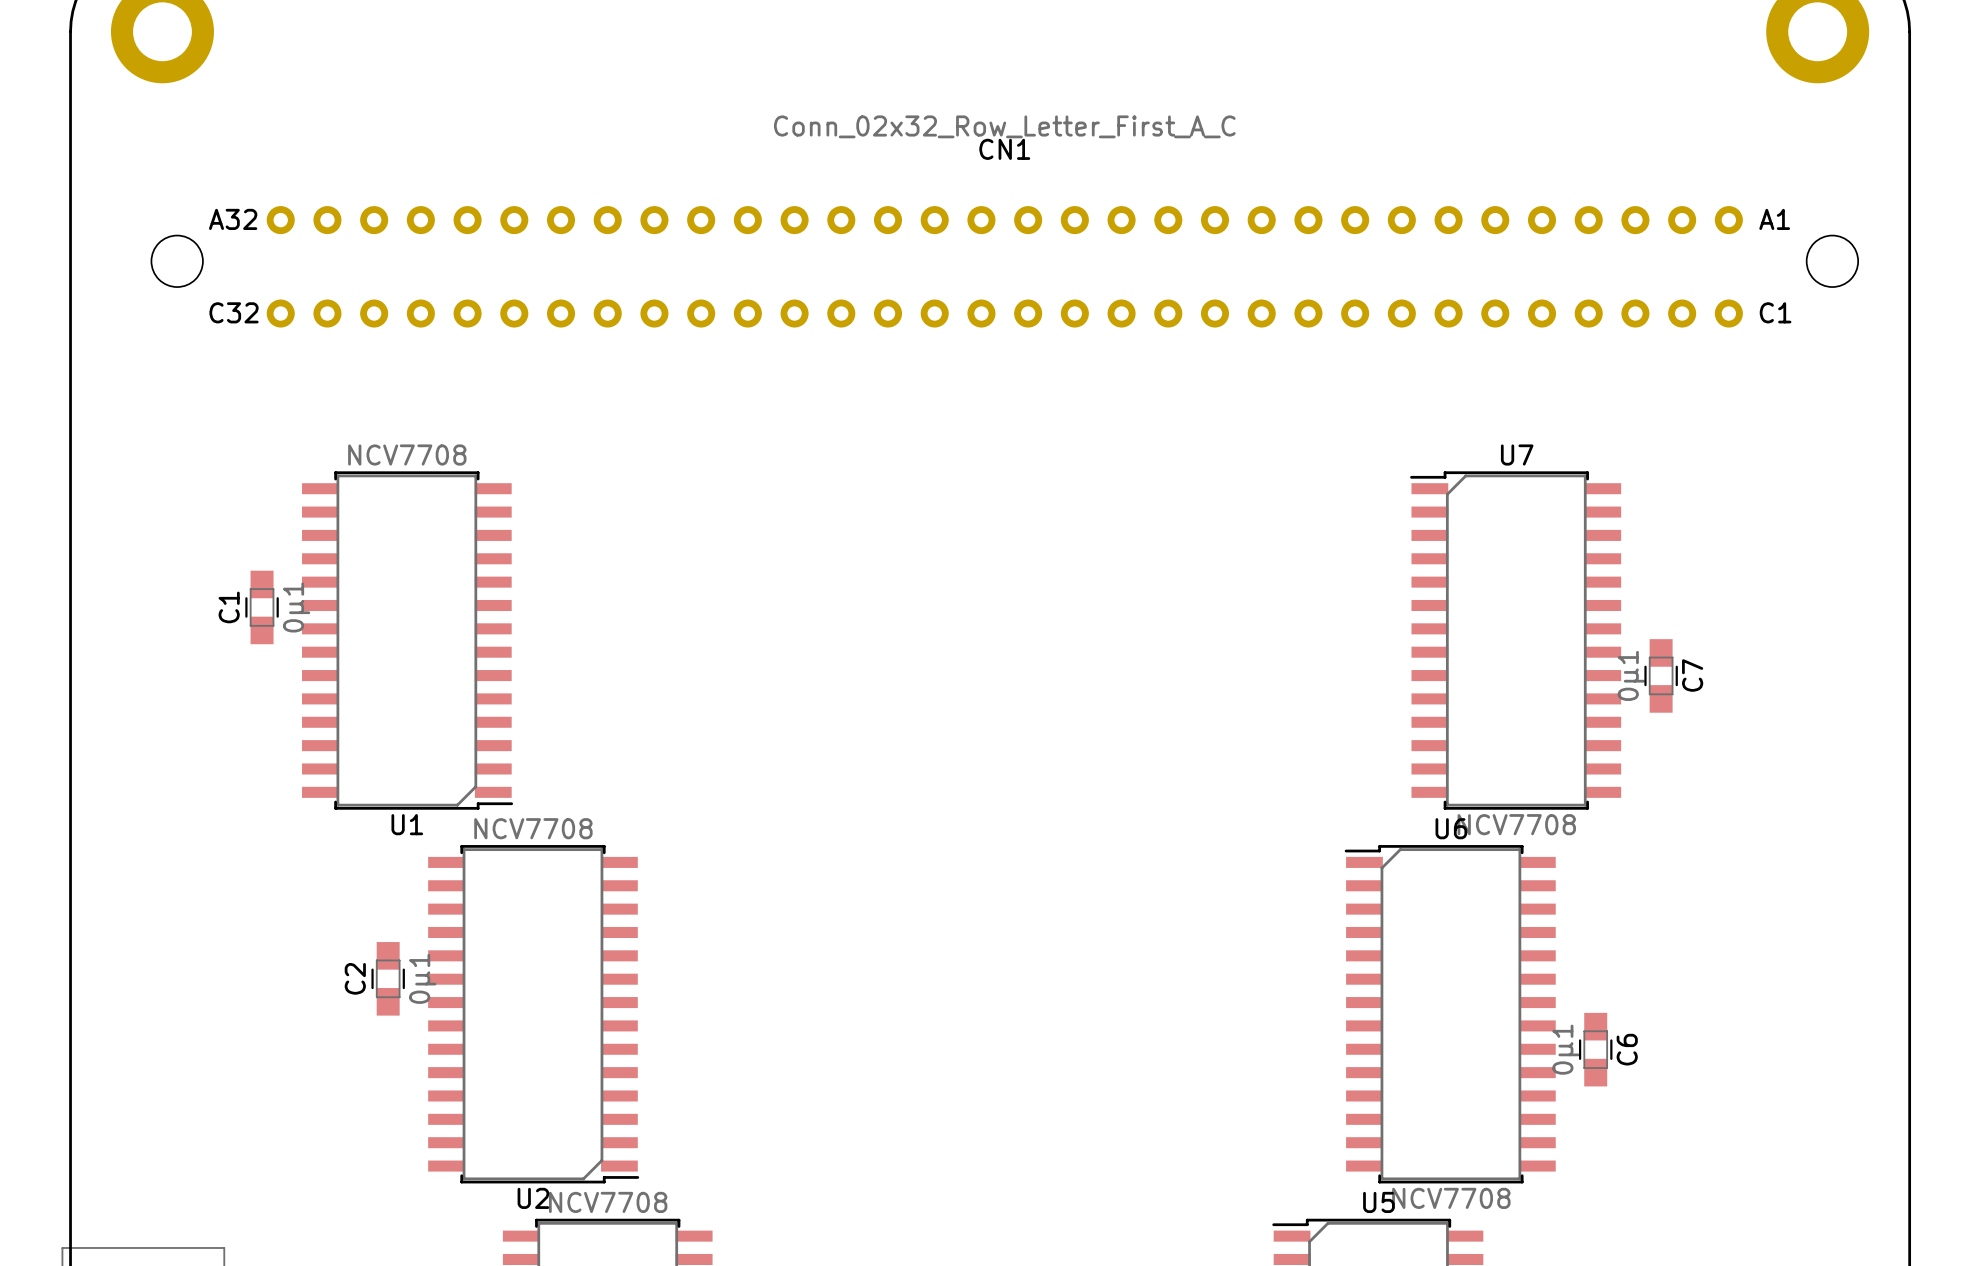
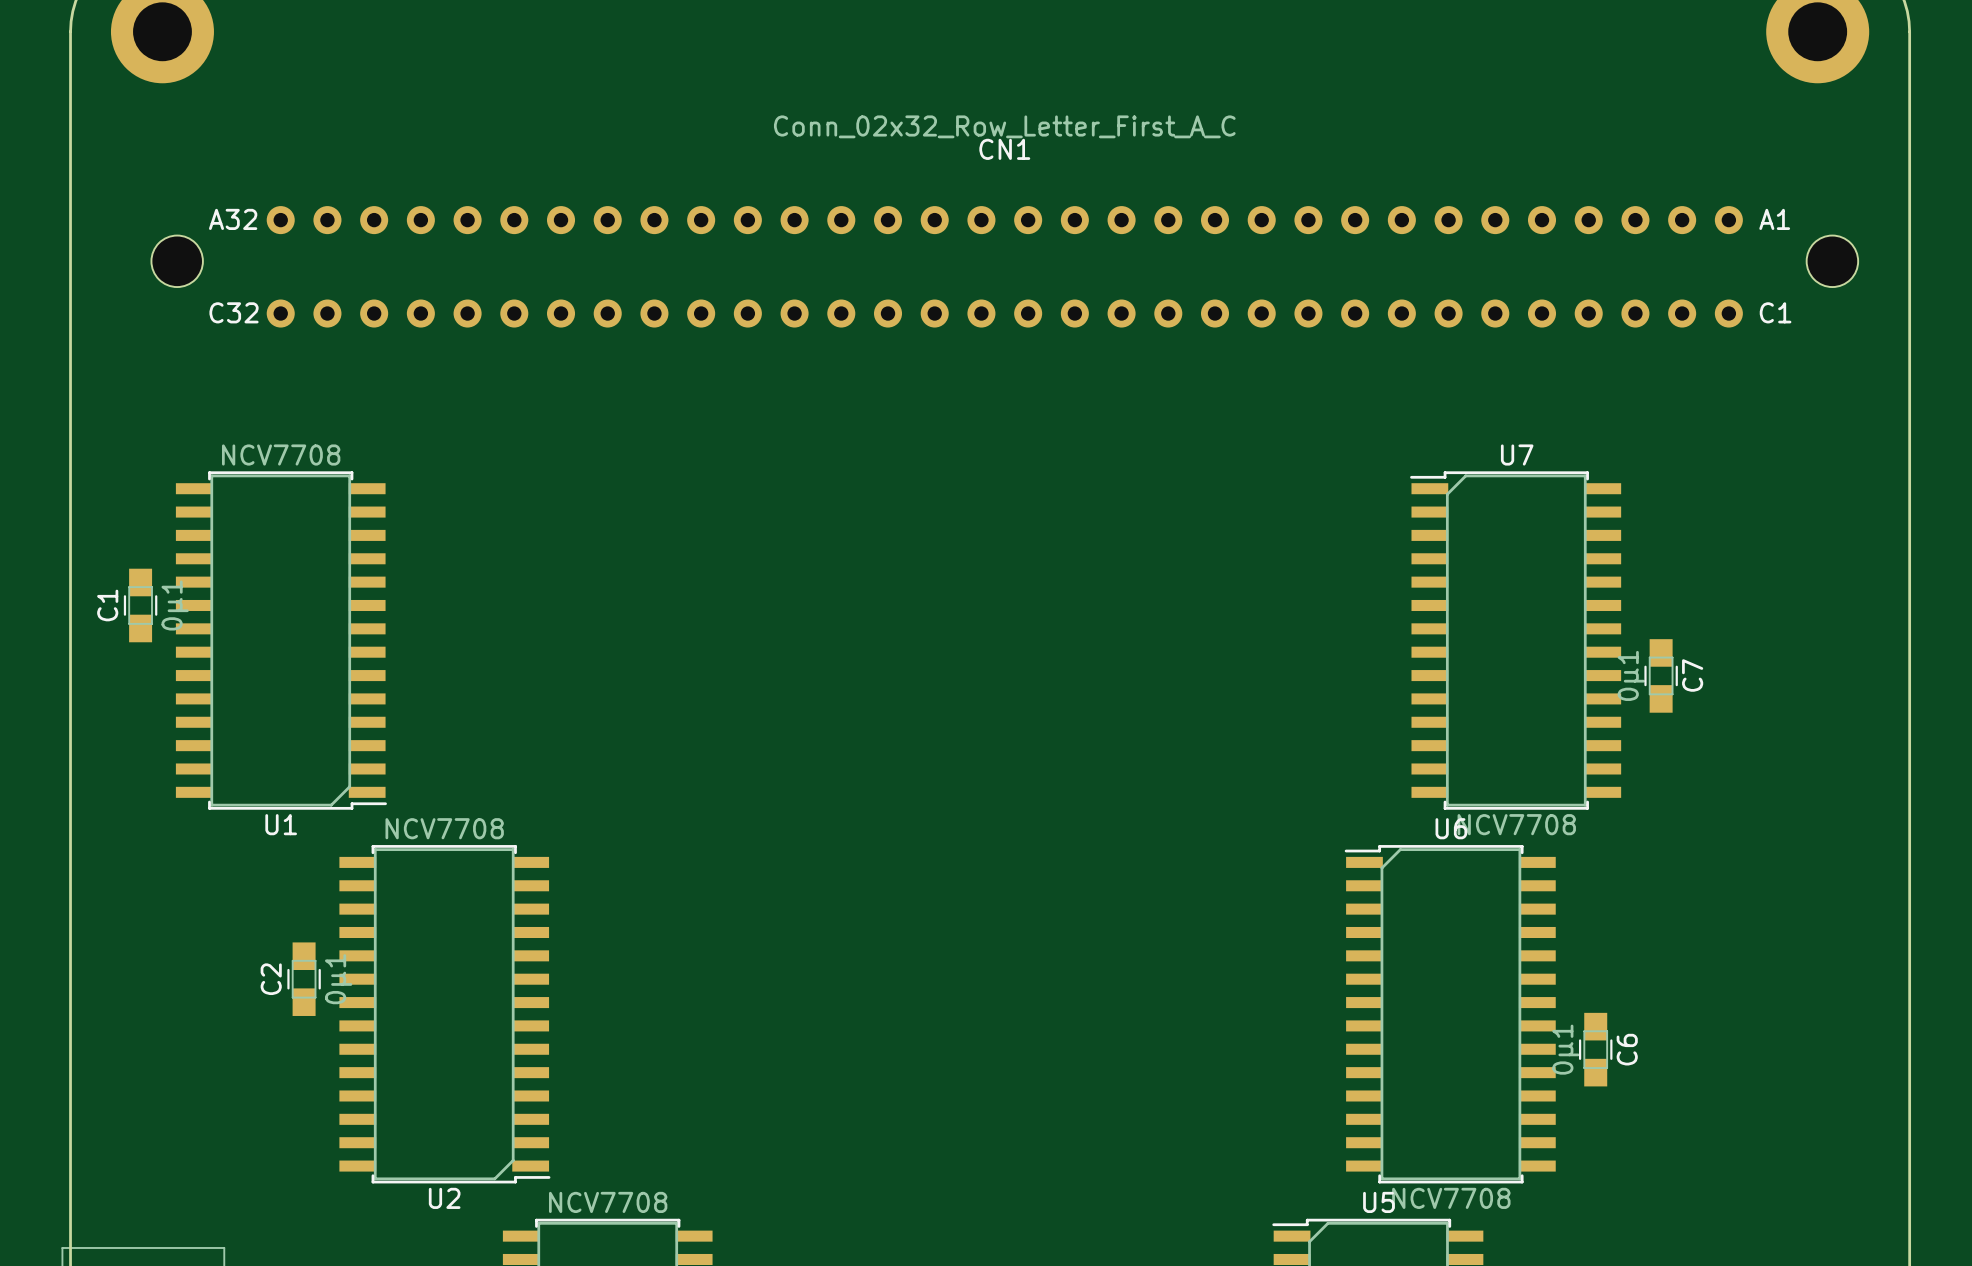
C1 position: (262, 607) -> (140, 605)
U1 position: (407, 640) -> (281, 640)
C2 position: (388, 978) -> (304, 979)
U2 position: (533, 1014) -> (444, 1014)

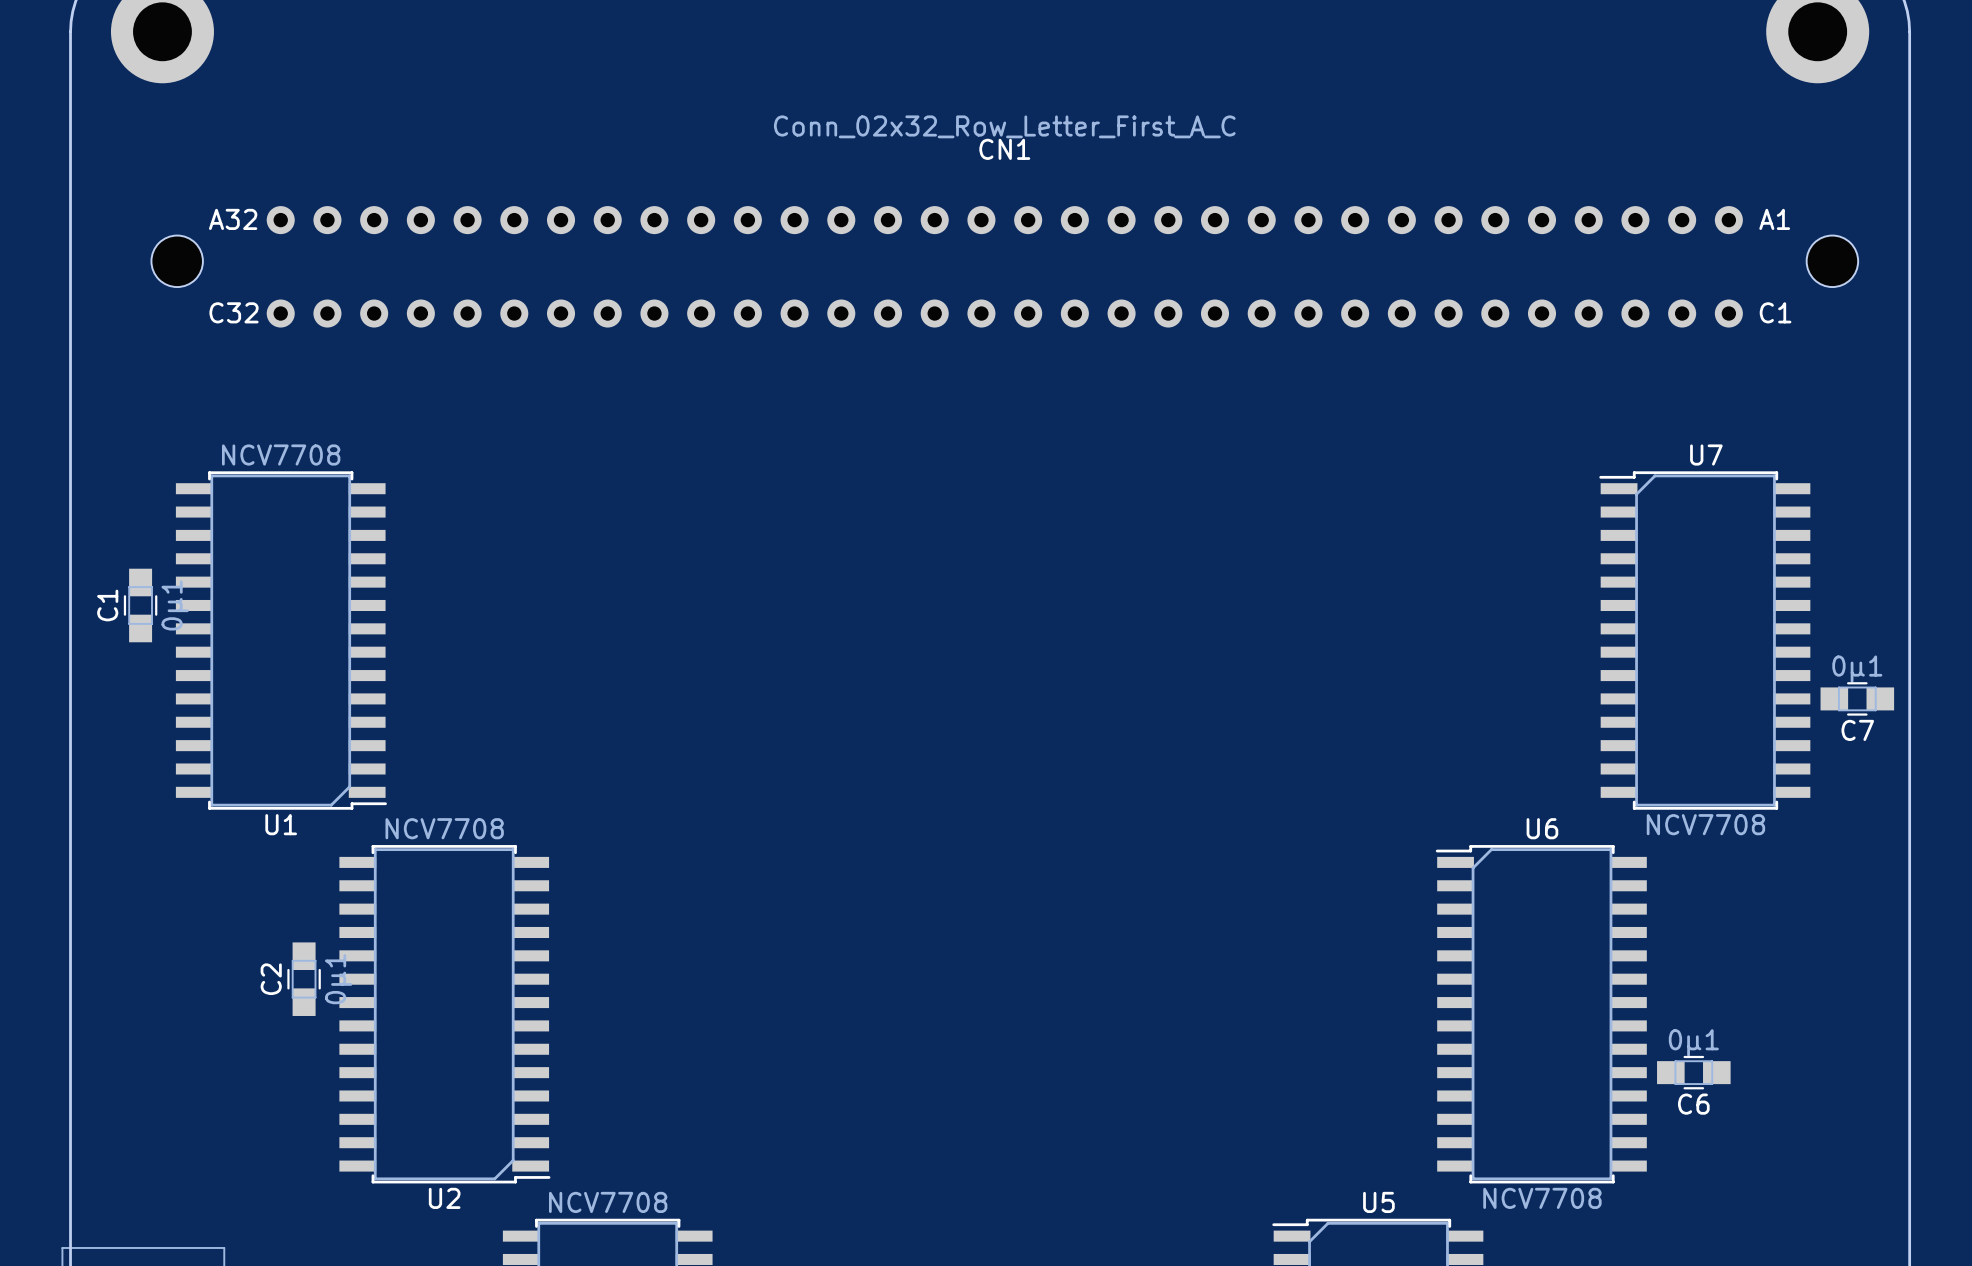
U7 position: (1515, 640) -> (1704, 640)
C7 rotation: 0° (1661, 675) -> 90° clockwise (1857, 698)
C7 position: (1661, 675) -> (1857, 698)
U6 position: (1450, 1014) -> (1541, 1014)
C6 rotation: 0° (1595, 1049) -> 90° clockwise (1693, 1072)
C6 position: (1595, 1049) -> (1693, 1072)

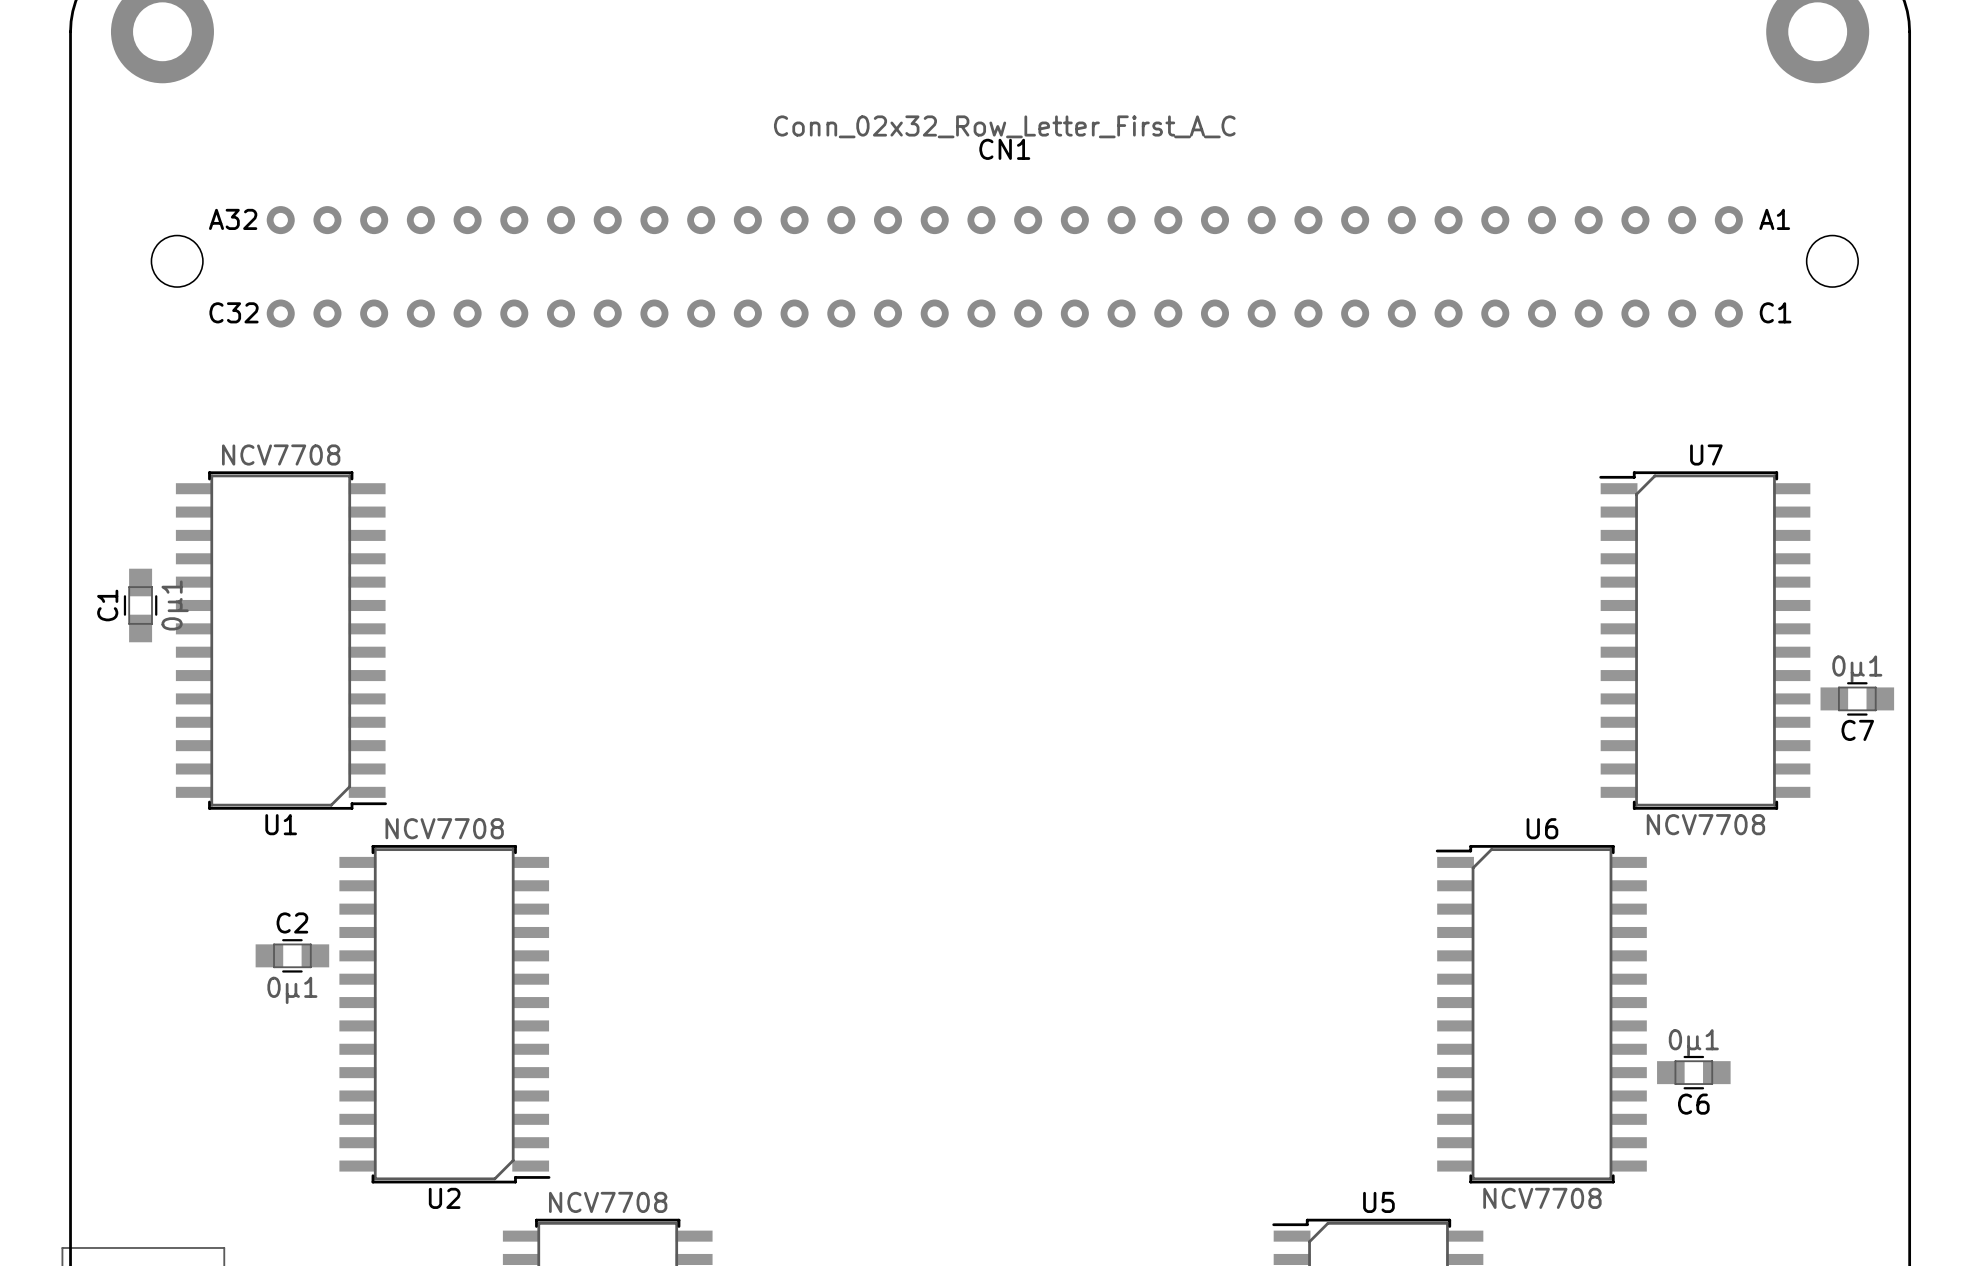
C2 rotation: 0° (304, 979) -> 90° clockwise (292, 955)

